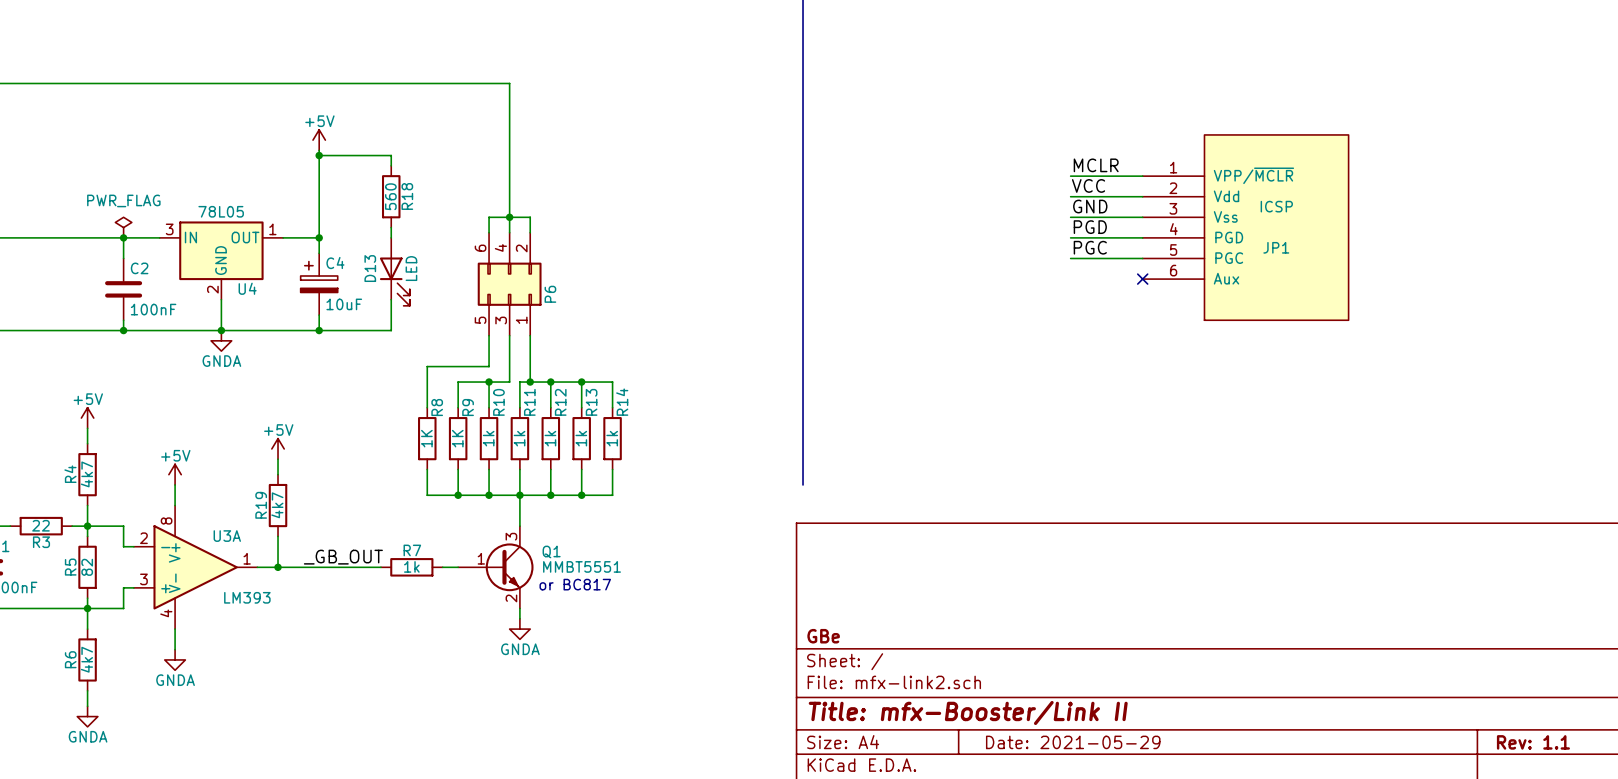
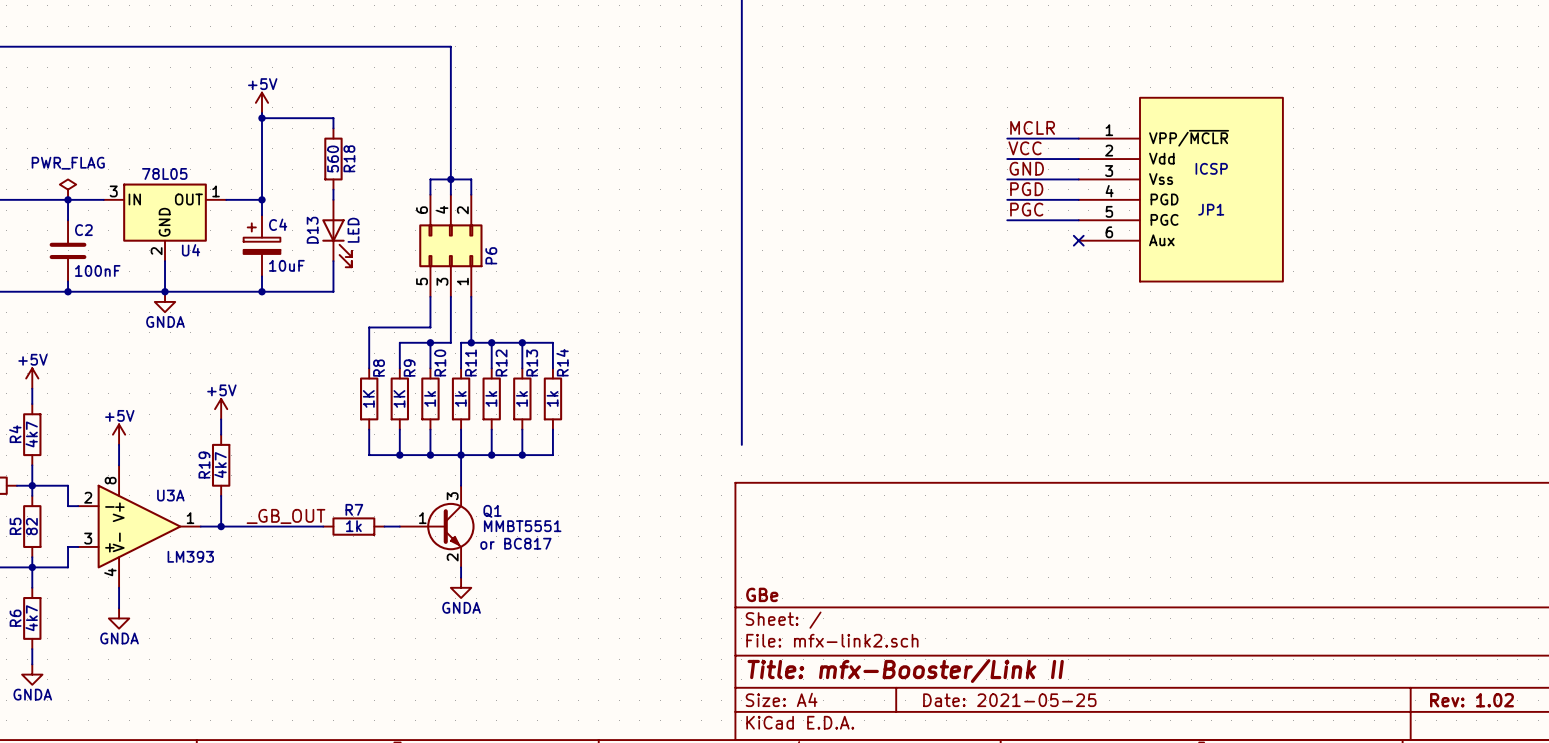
title block: Date: 2021-05-29 (1073, 742) -> Date: 2021-05-25 (1009, 700)
title block: Rev: 1.1 (1533, 742) -> Rev: 1.02 (1471, 700)

